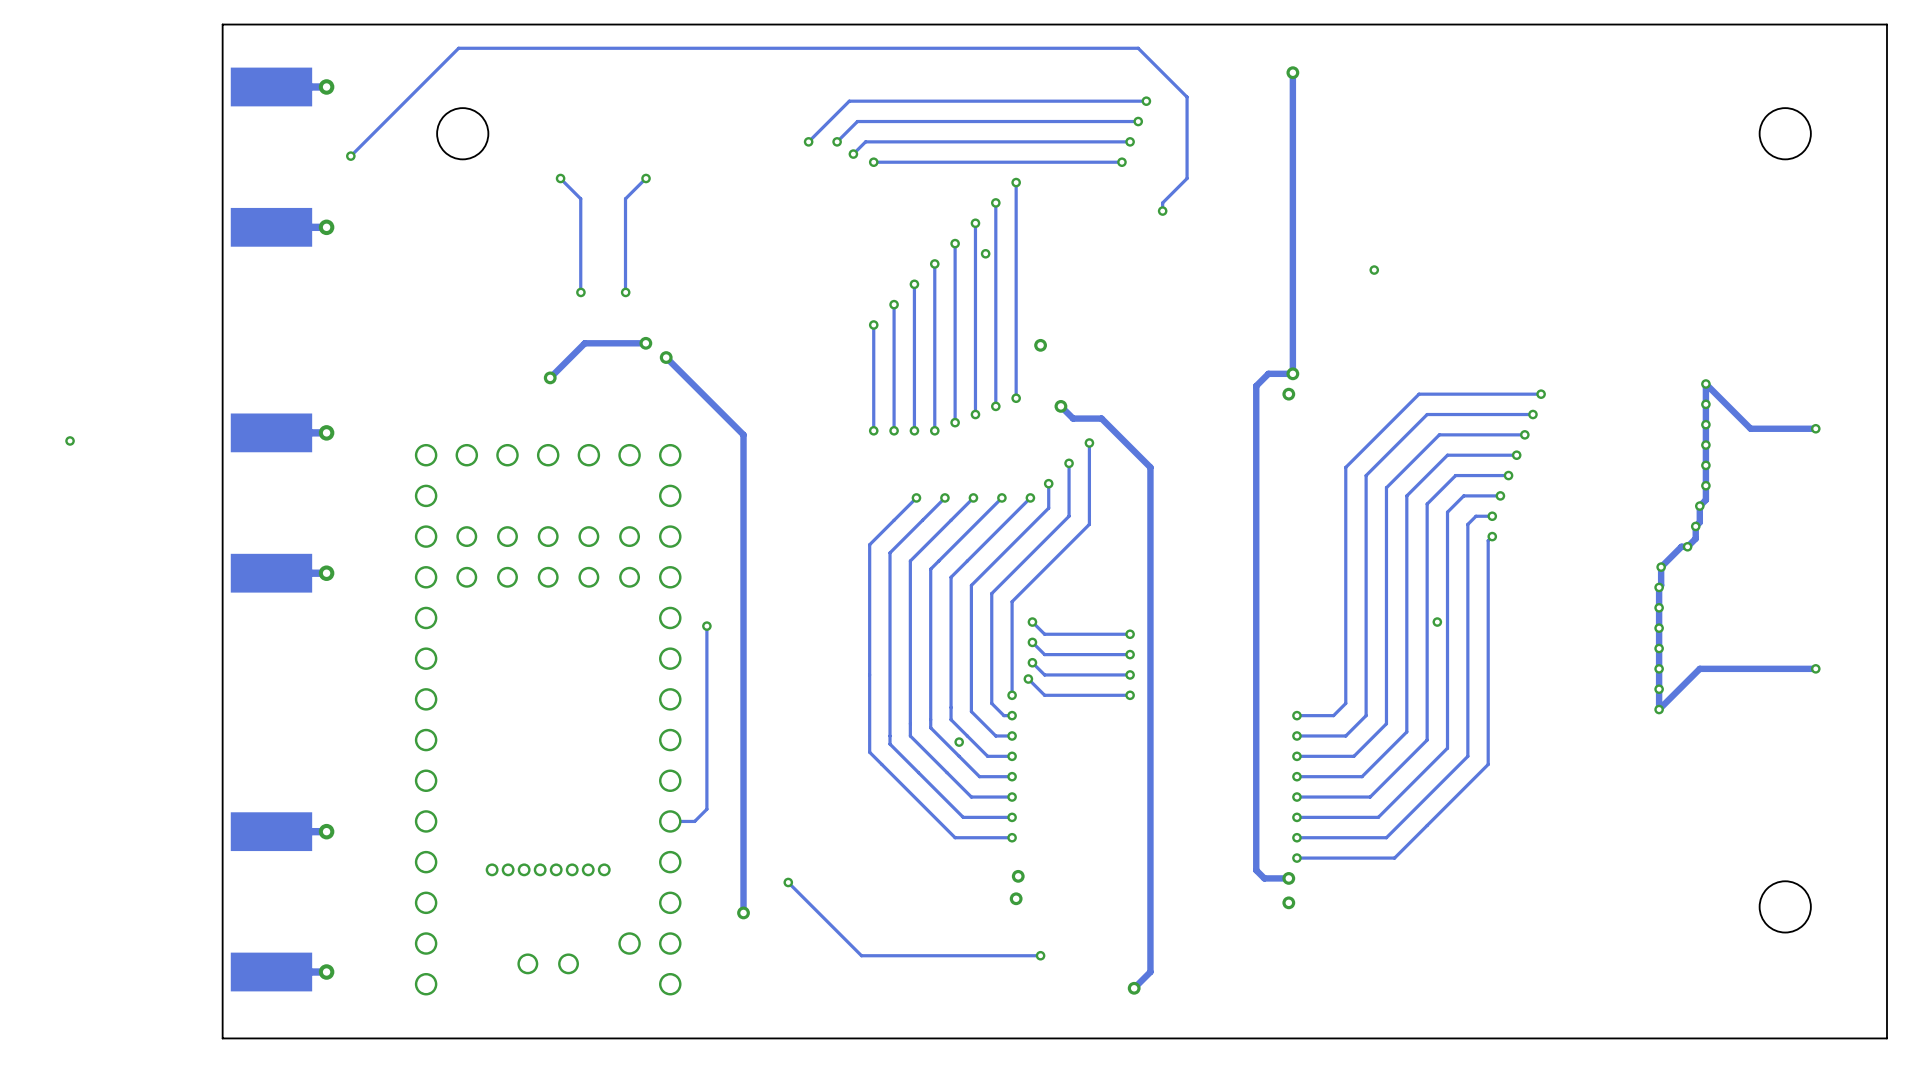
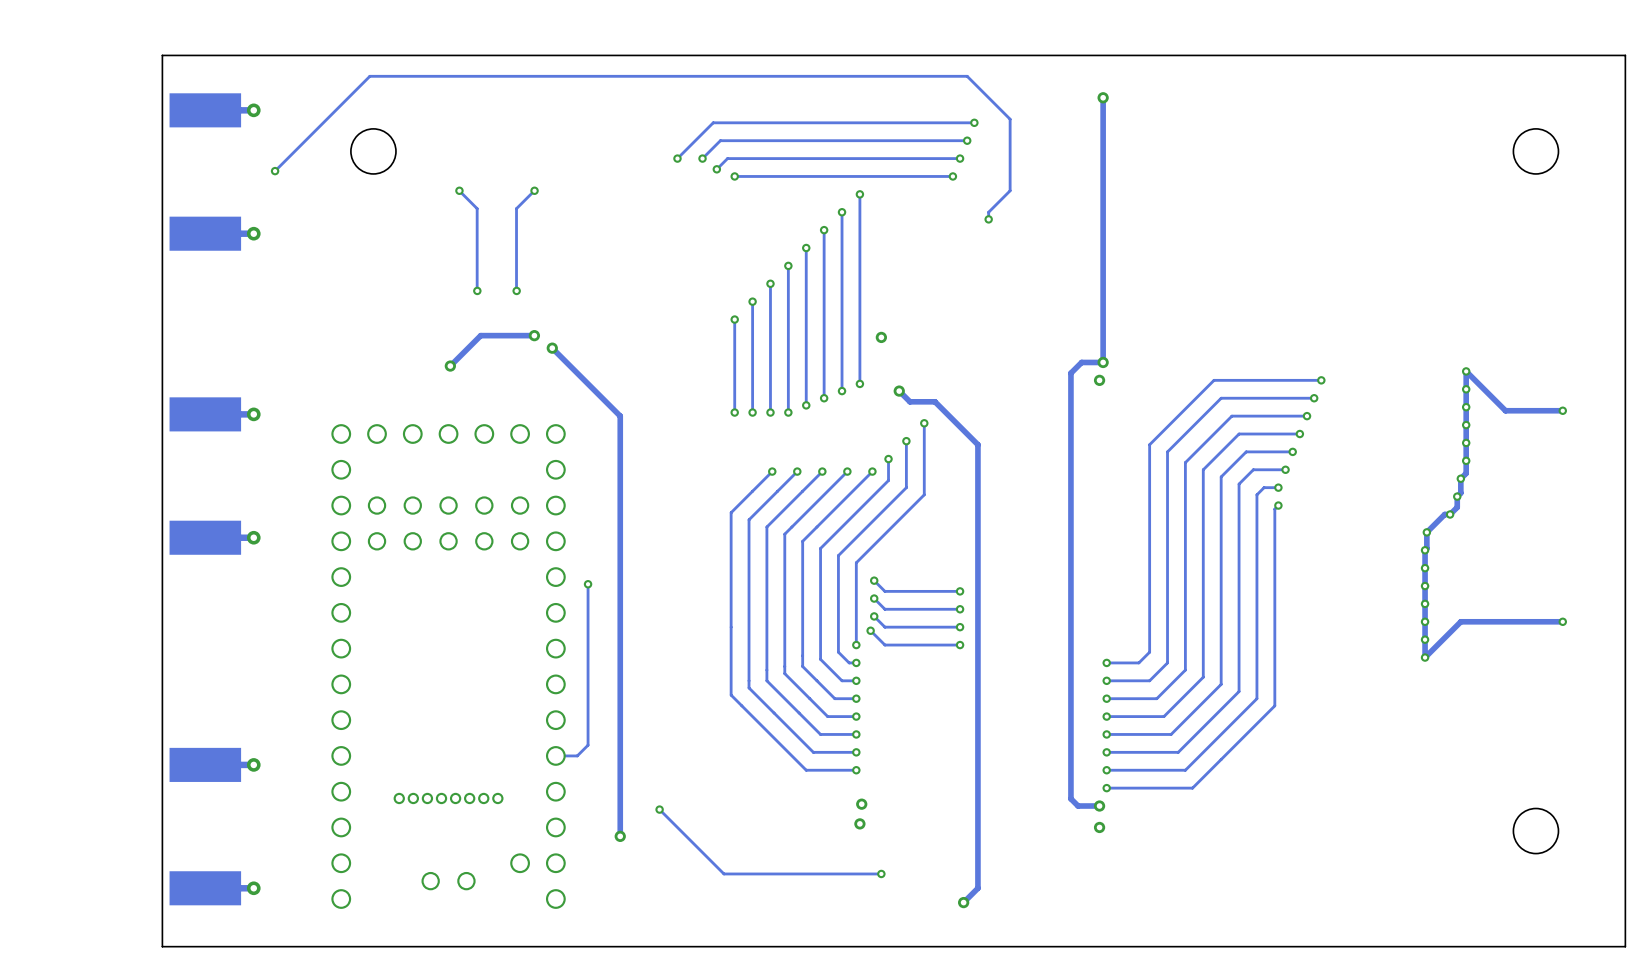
via: (985, 253) -> none
via: (1374, 270) -> none
via: (70, 440) -> none
via: (1437, 622) -> none
via: (959, 742) -> none

